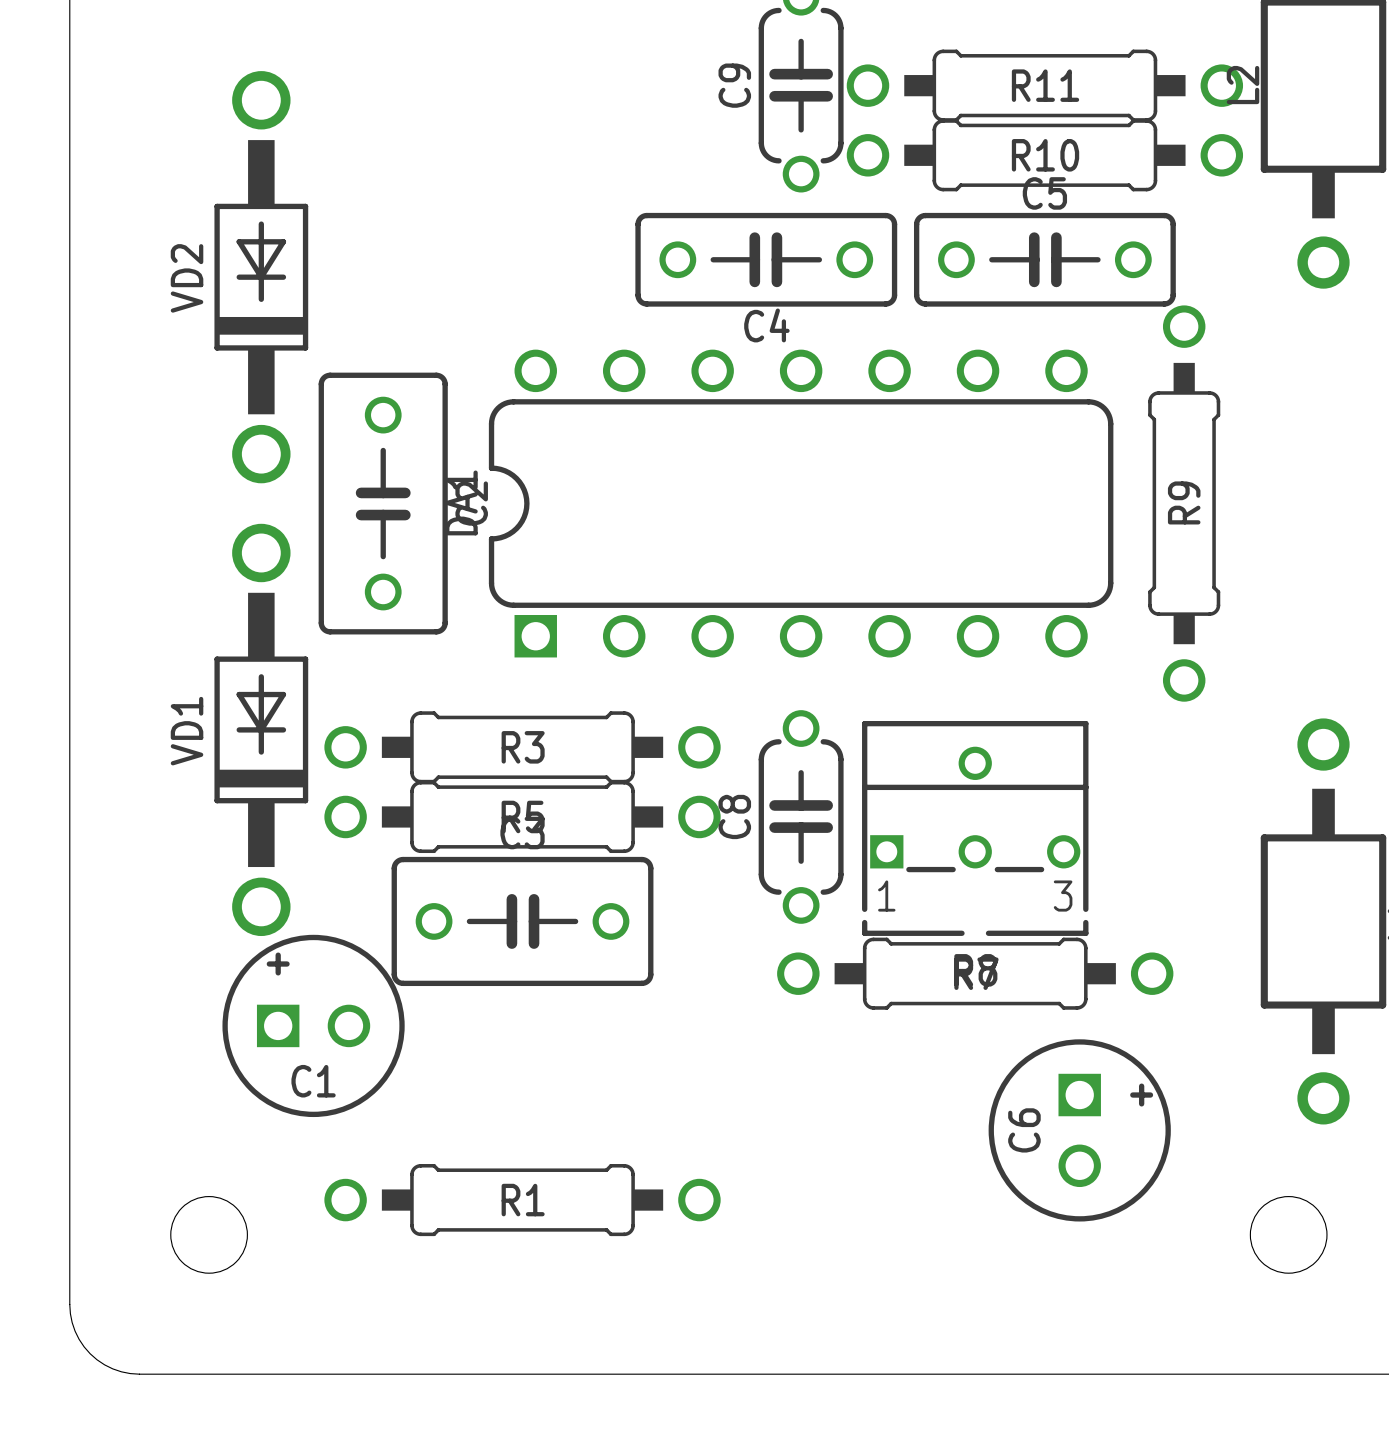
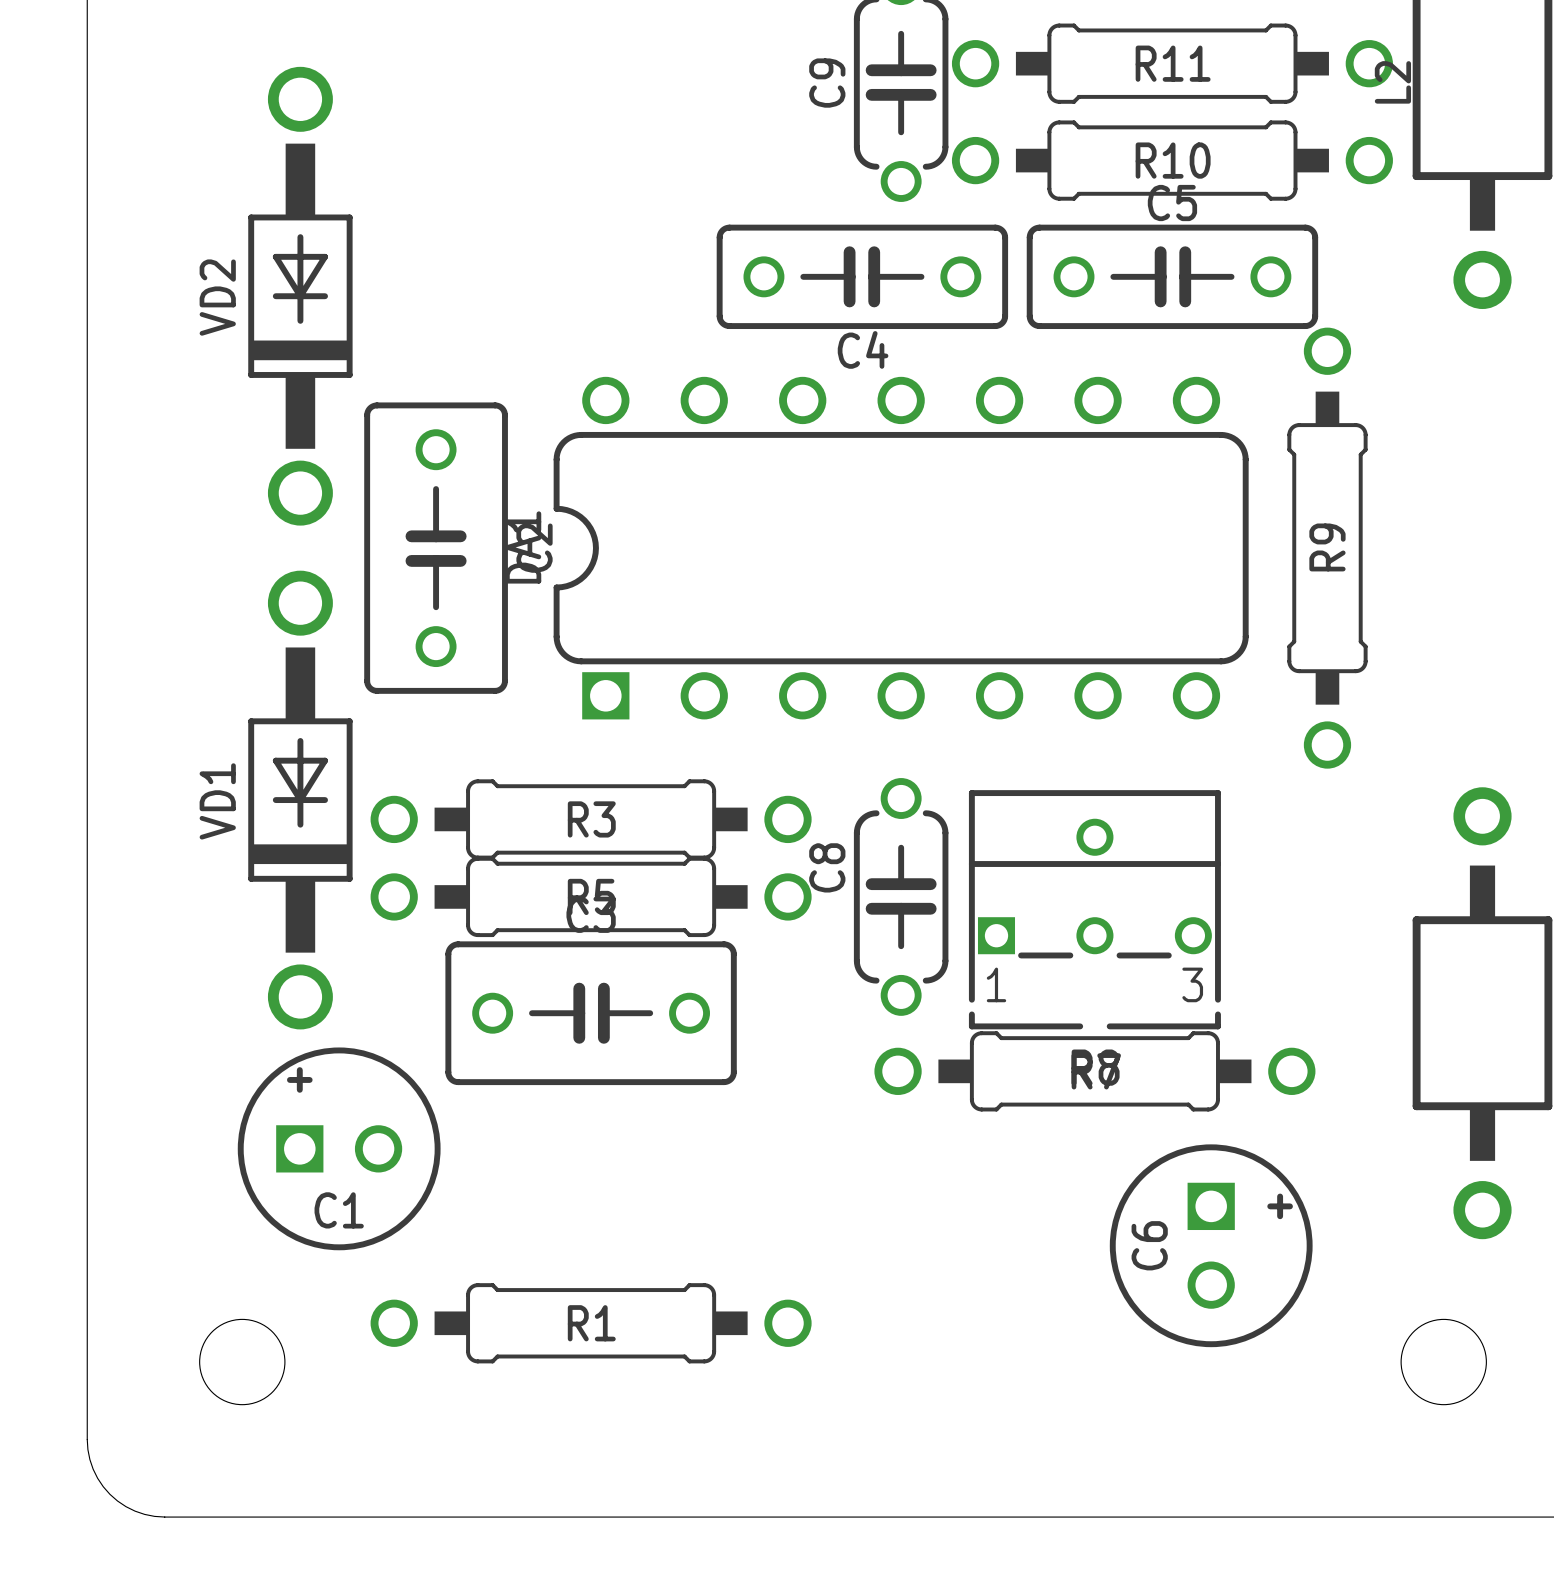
R11 position: (1044, 85) -> (1172, 63)
C8 name position: C8 (734, 816) -> C8 (827, 867)
C1 position: (313, 1025) -> (339, 1148)

